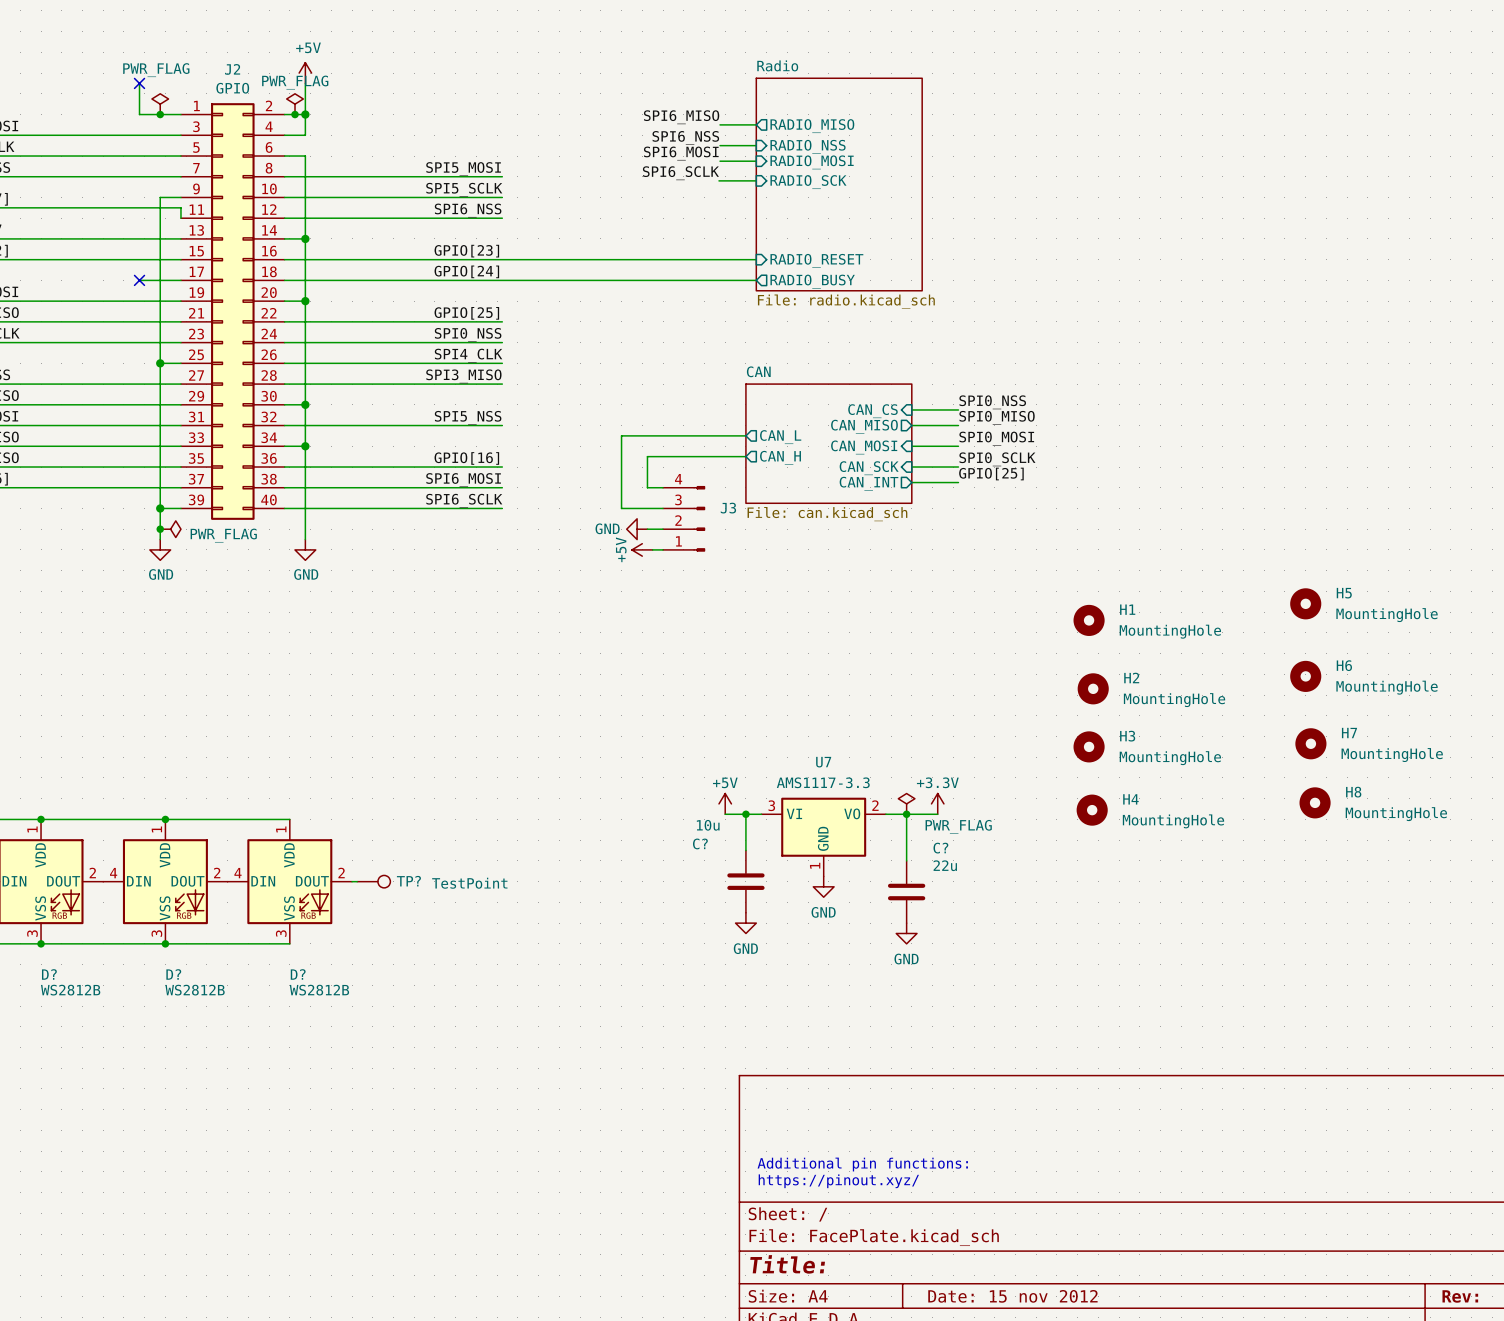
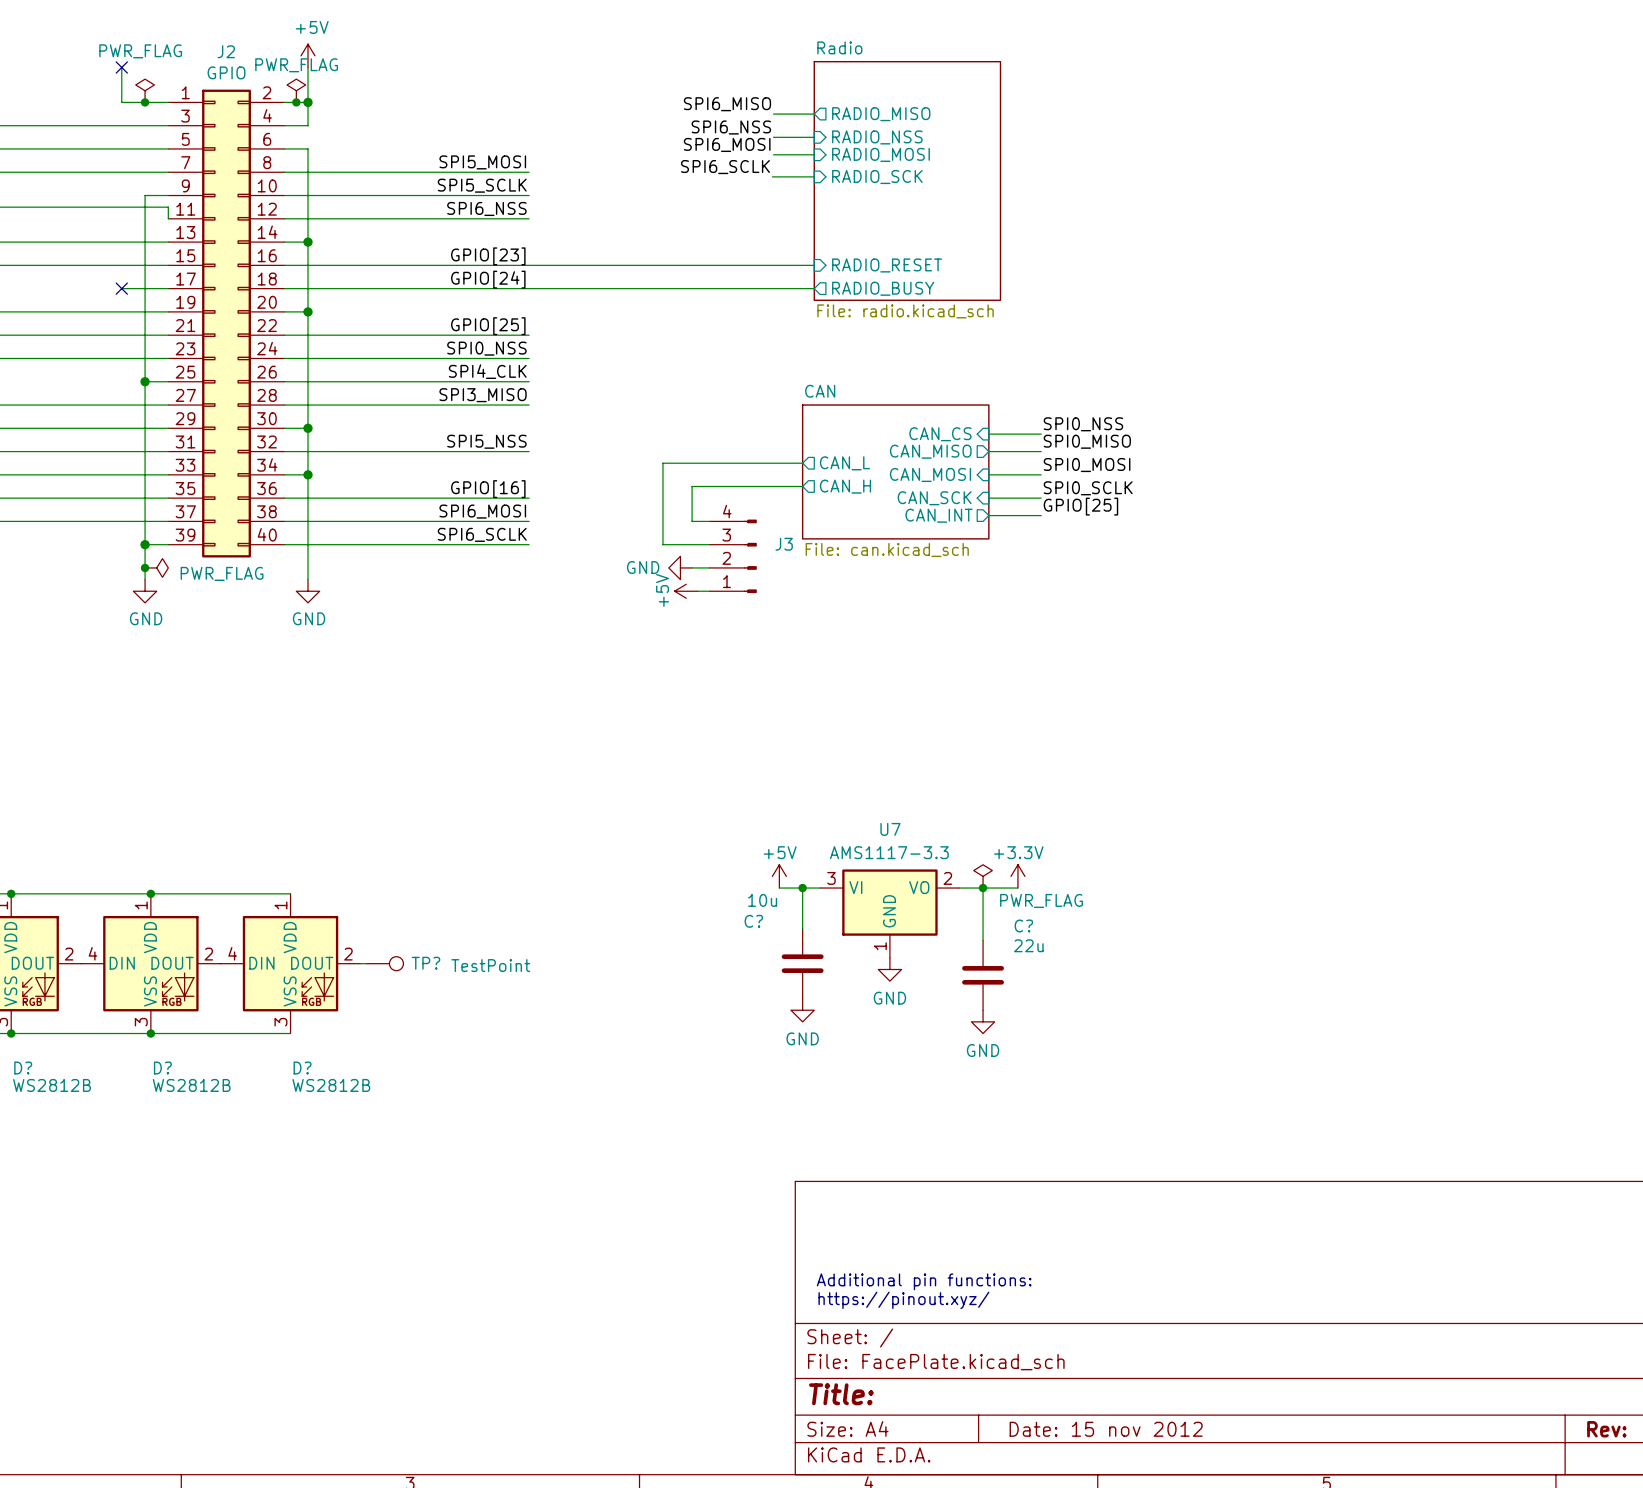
H5: MountingHole (1305, 603) -> none
H1: MountingHole (1089, 620) -> none
H6: MountingHole (1305, 676) -> none
H2: MountingHole (1093, 688) -> none
H7: MountingHole (1310, 743) -> none
H3: MountingHole (1089, 746) -> none
H8: MountingHole (1315, 802) -> none
H4: MountingHole (1092, 810) -> none

